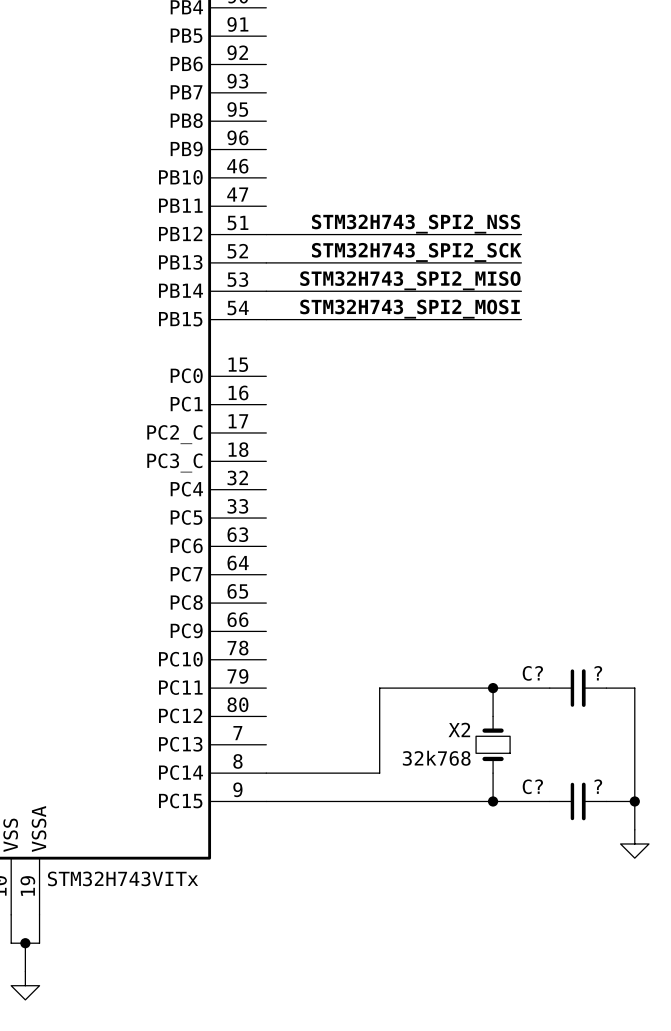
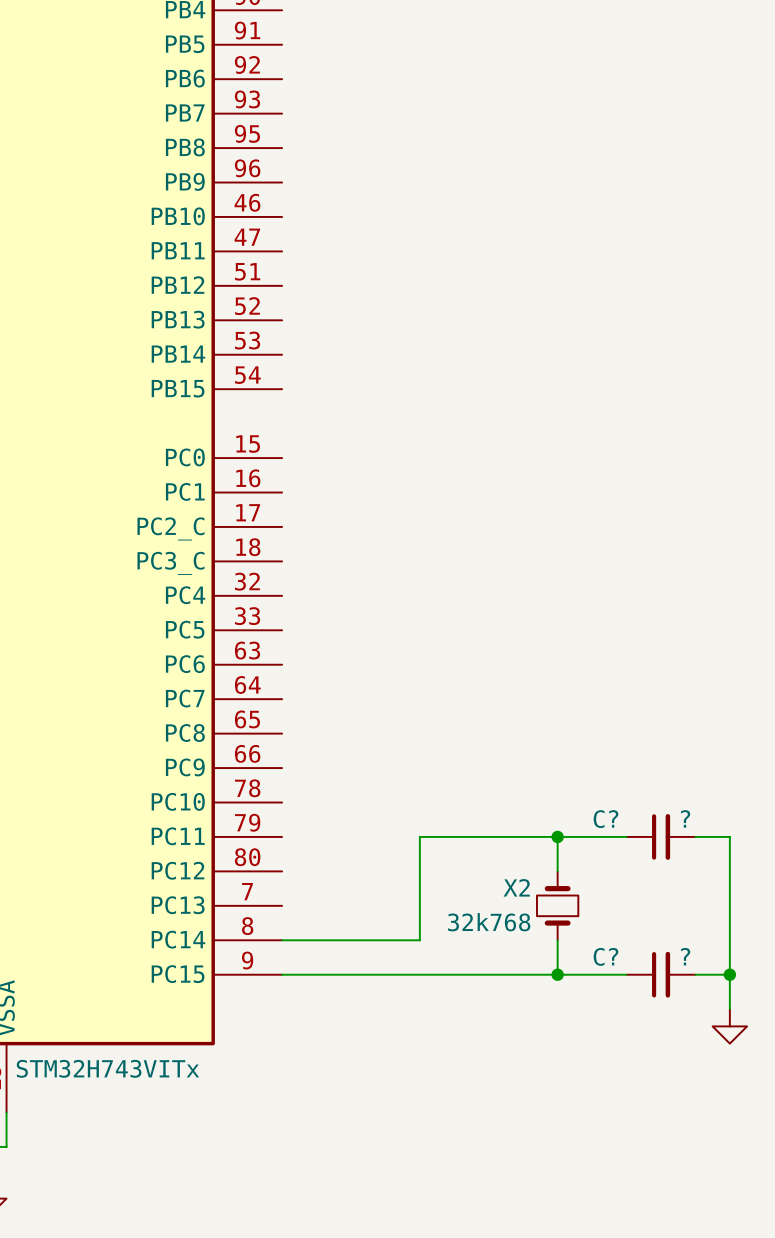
label: STM32H743_SPI2_NSS (416, 224) -> none
wire: (266, 234) (521, 234) -> none
label: STM32H743_SPI2_SCK (416, 252) -> none
wire: (266, 262) (521, 262) -> none
label: STM32H743_SPI2_MISO (410, 280) -> none
wire: (266, 291) (521, 291) -> none
label: STM32H743_SPI2_MOSI (410, 309) -> none
wire: (266, 319) (521, 319) -> none

